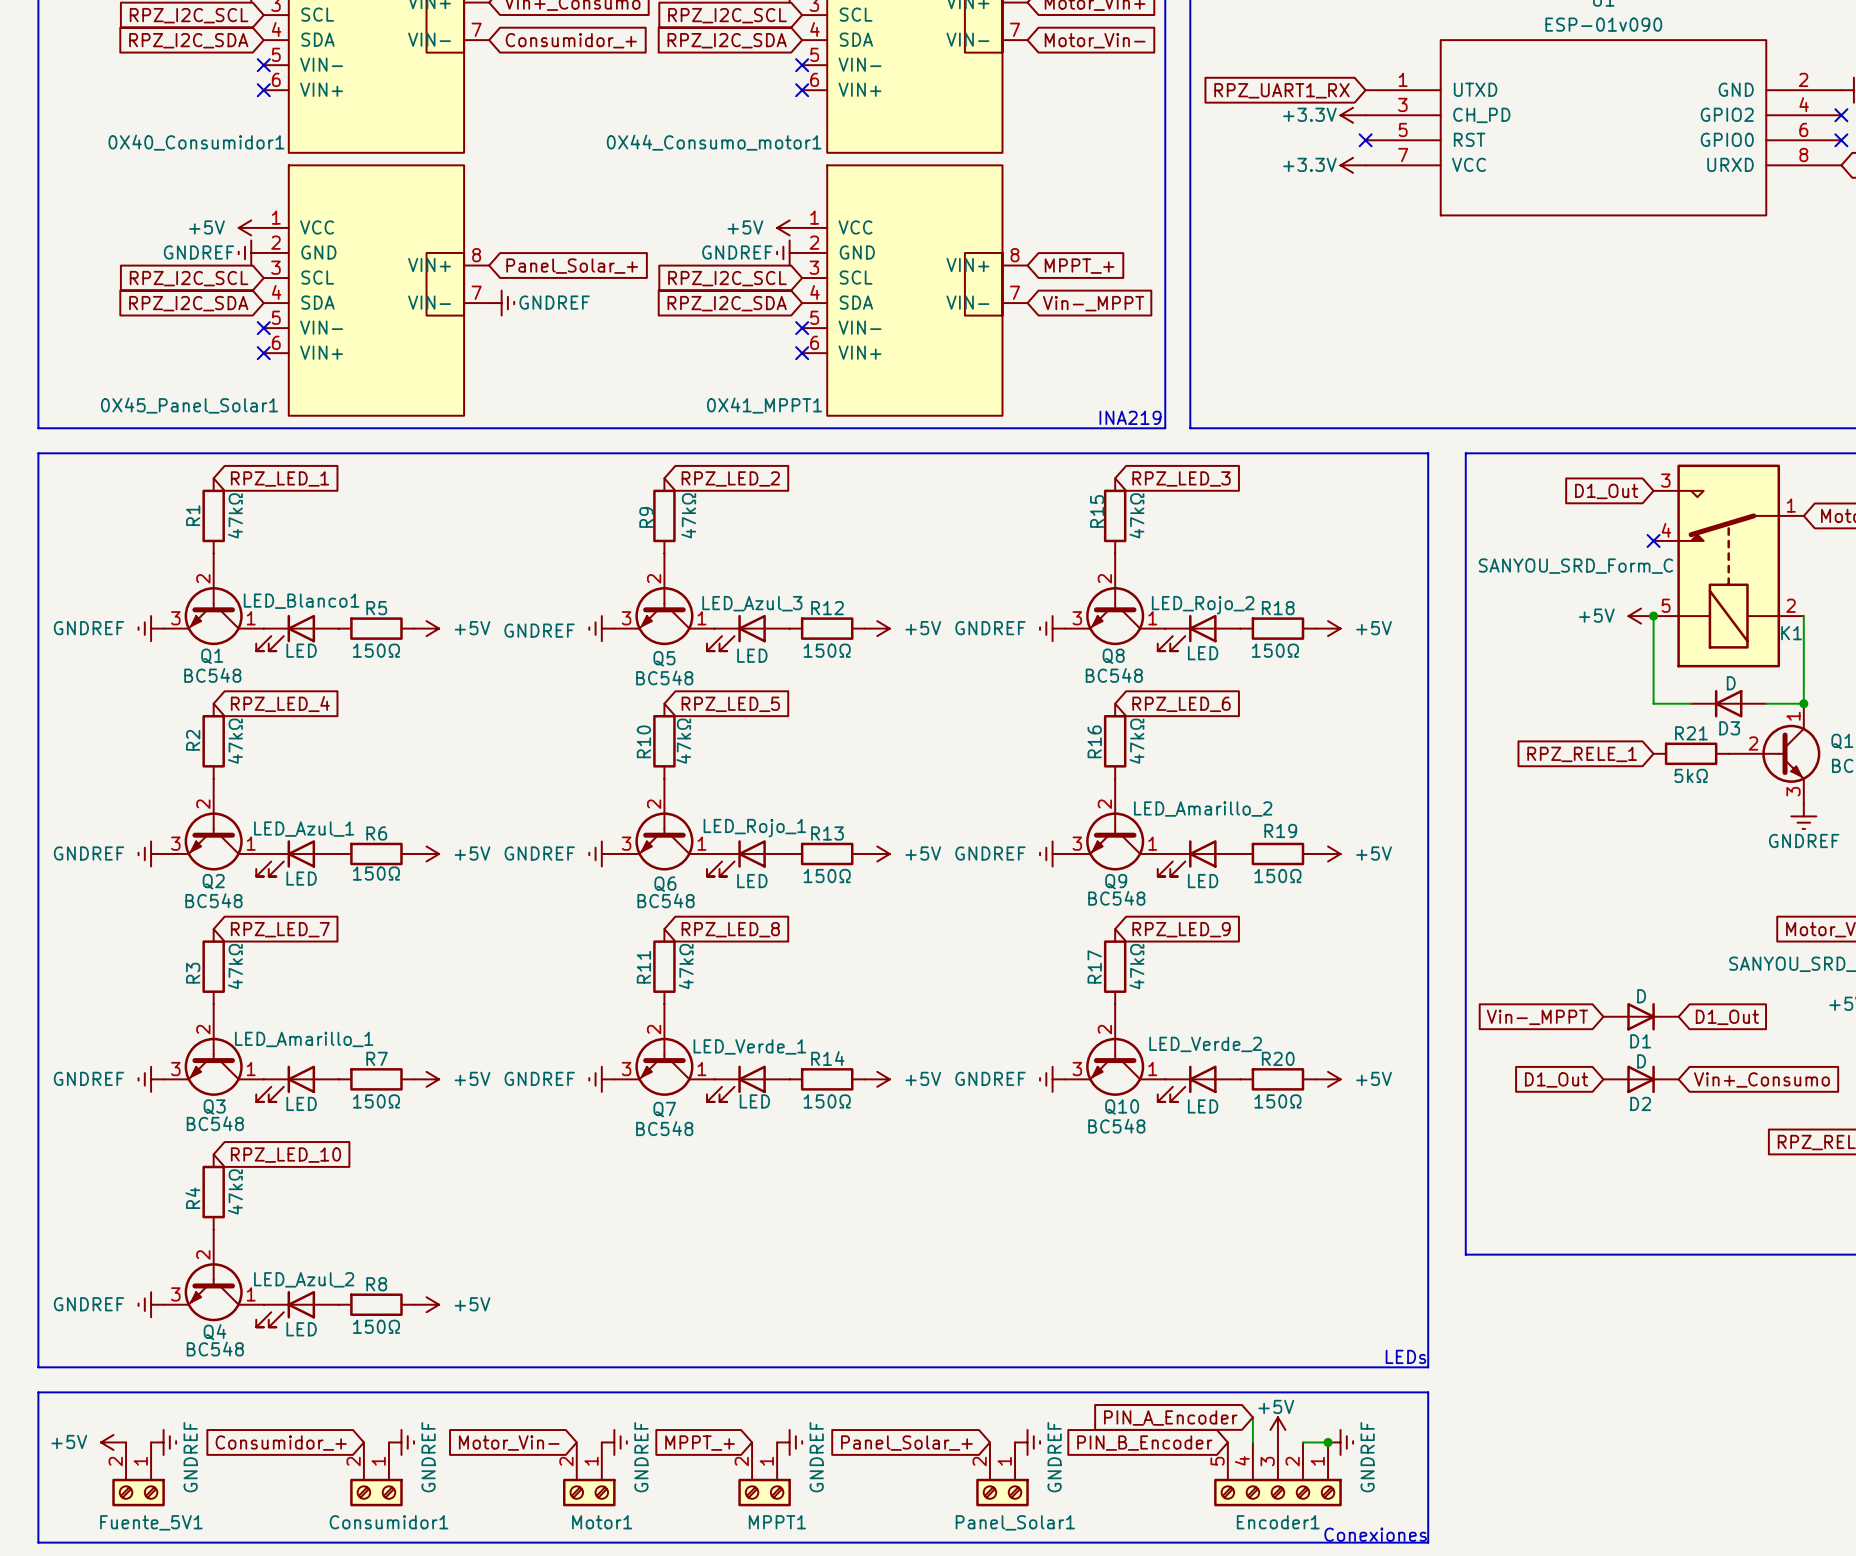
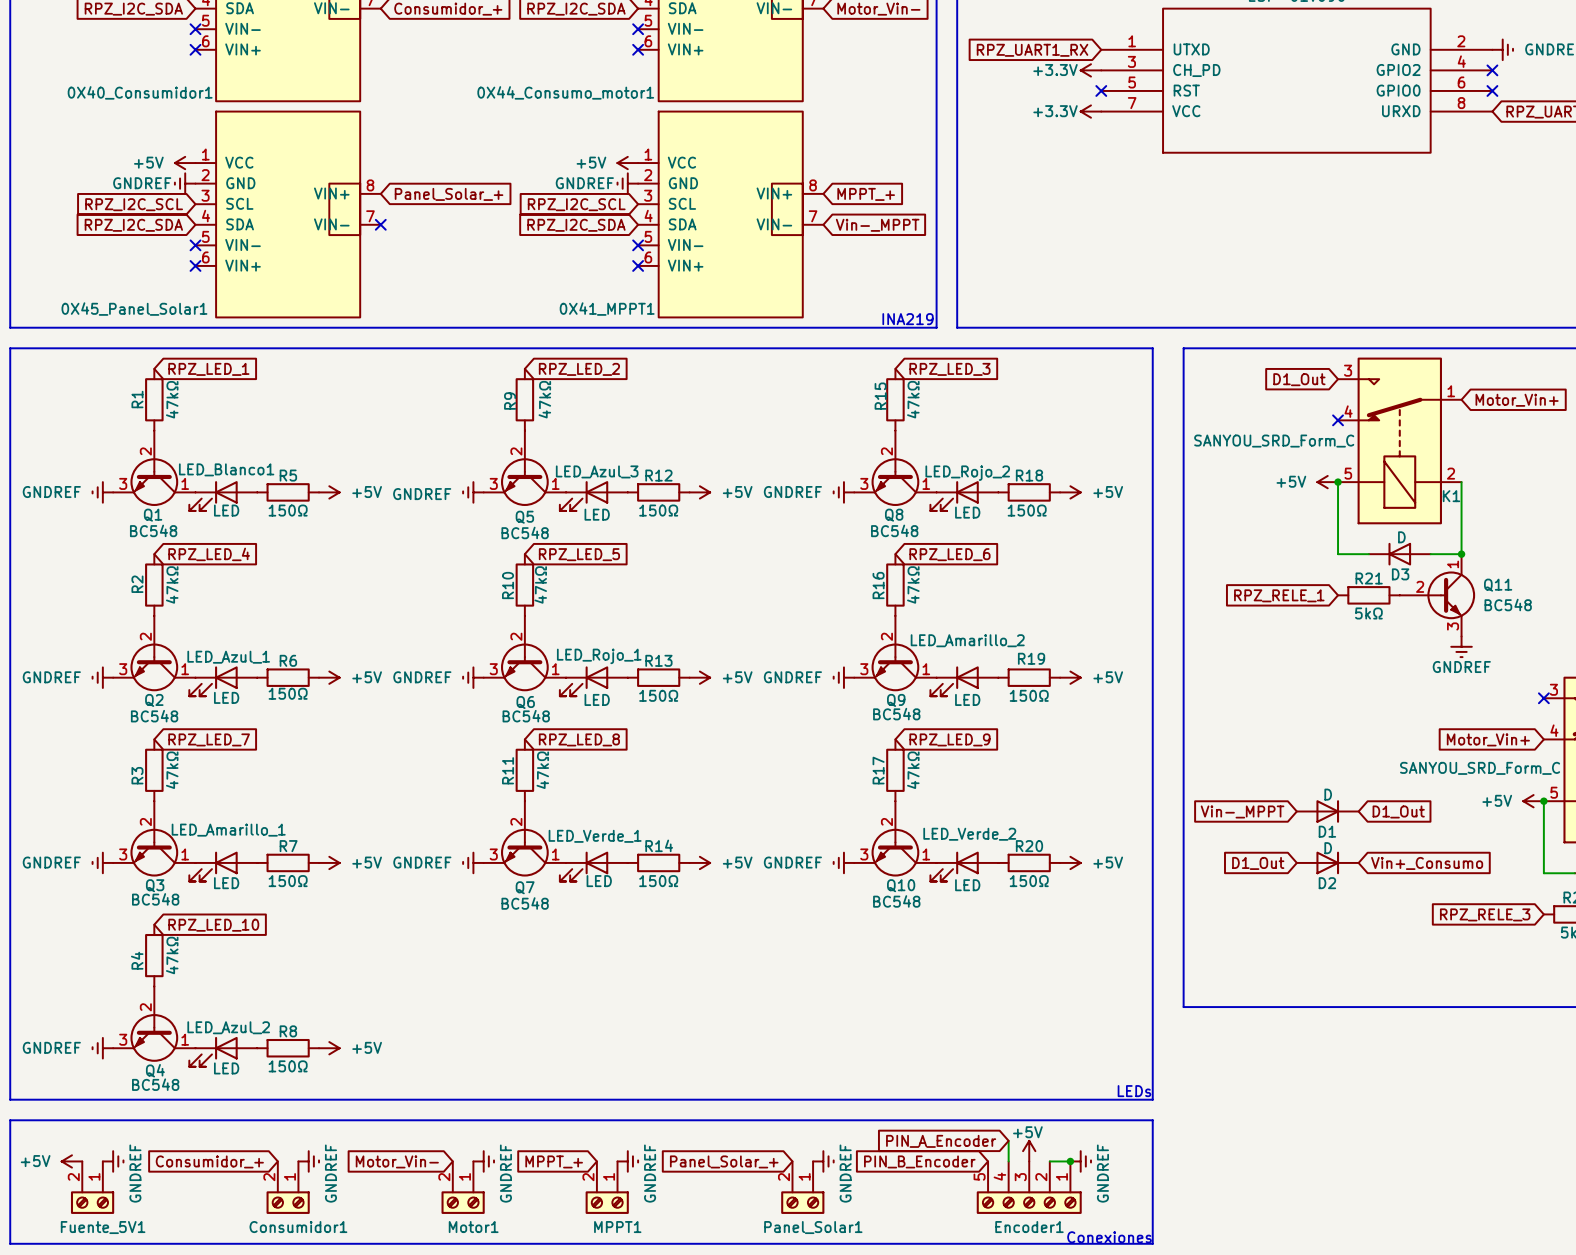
no-connect mark: none -> (380, 224)
power symbol: GNDREF (501, 303) -> none

